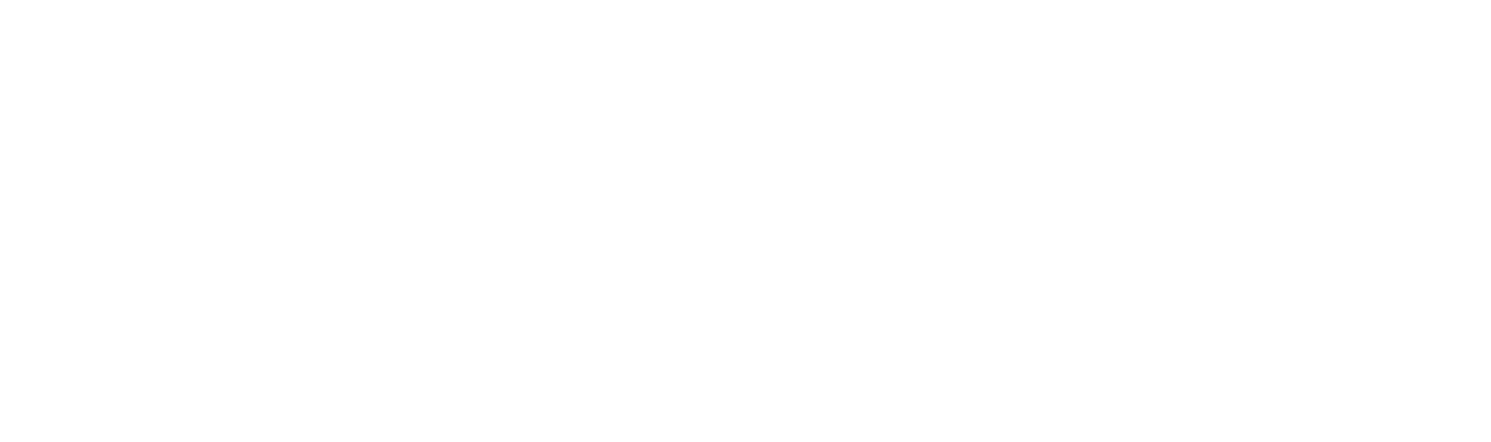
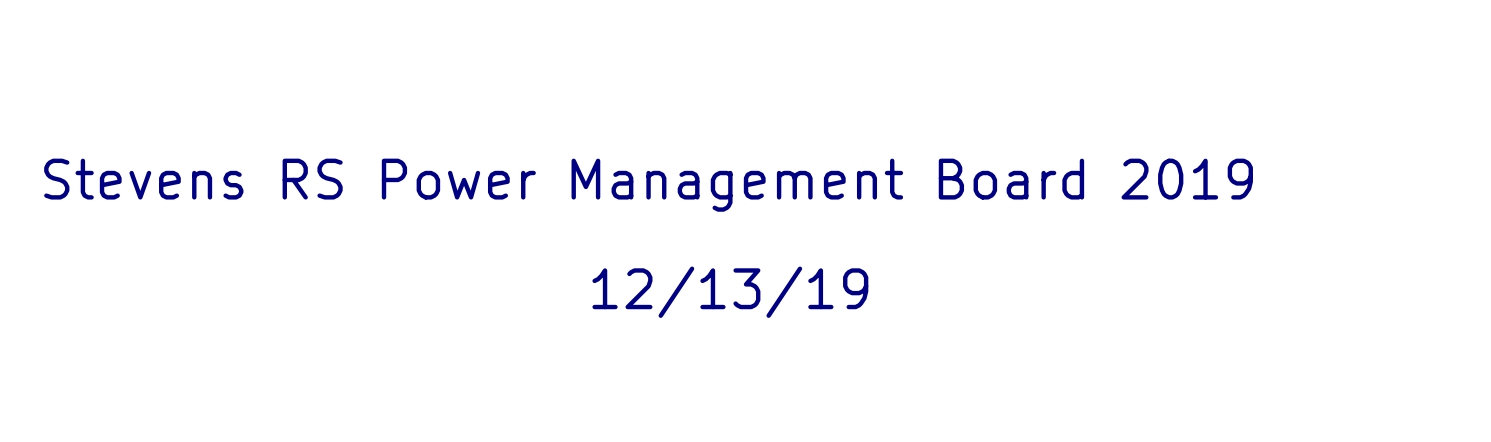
text: none -> Stevens RS Power Management Board 2019 (648, 185)
text: none -> 12/13/19 (730, 292)

